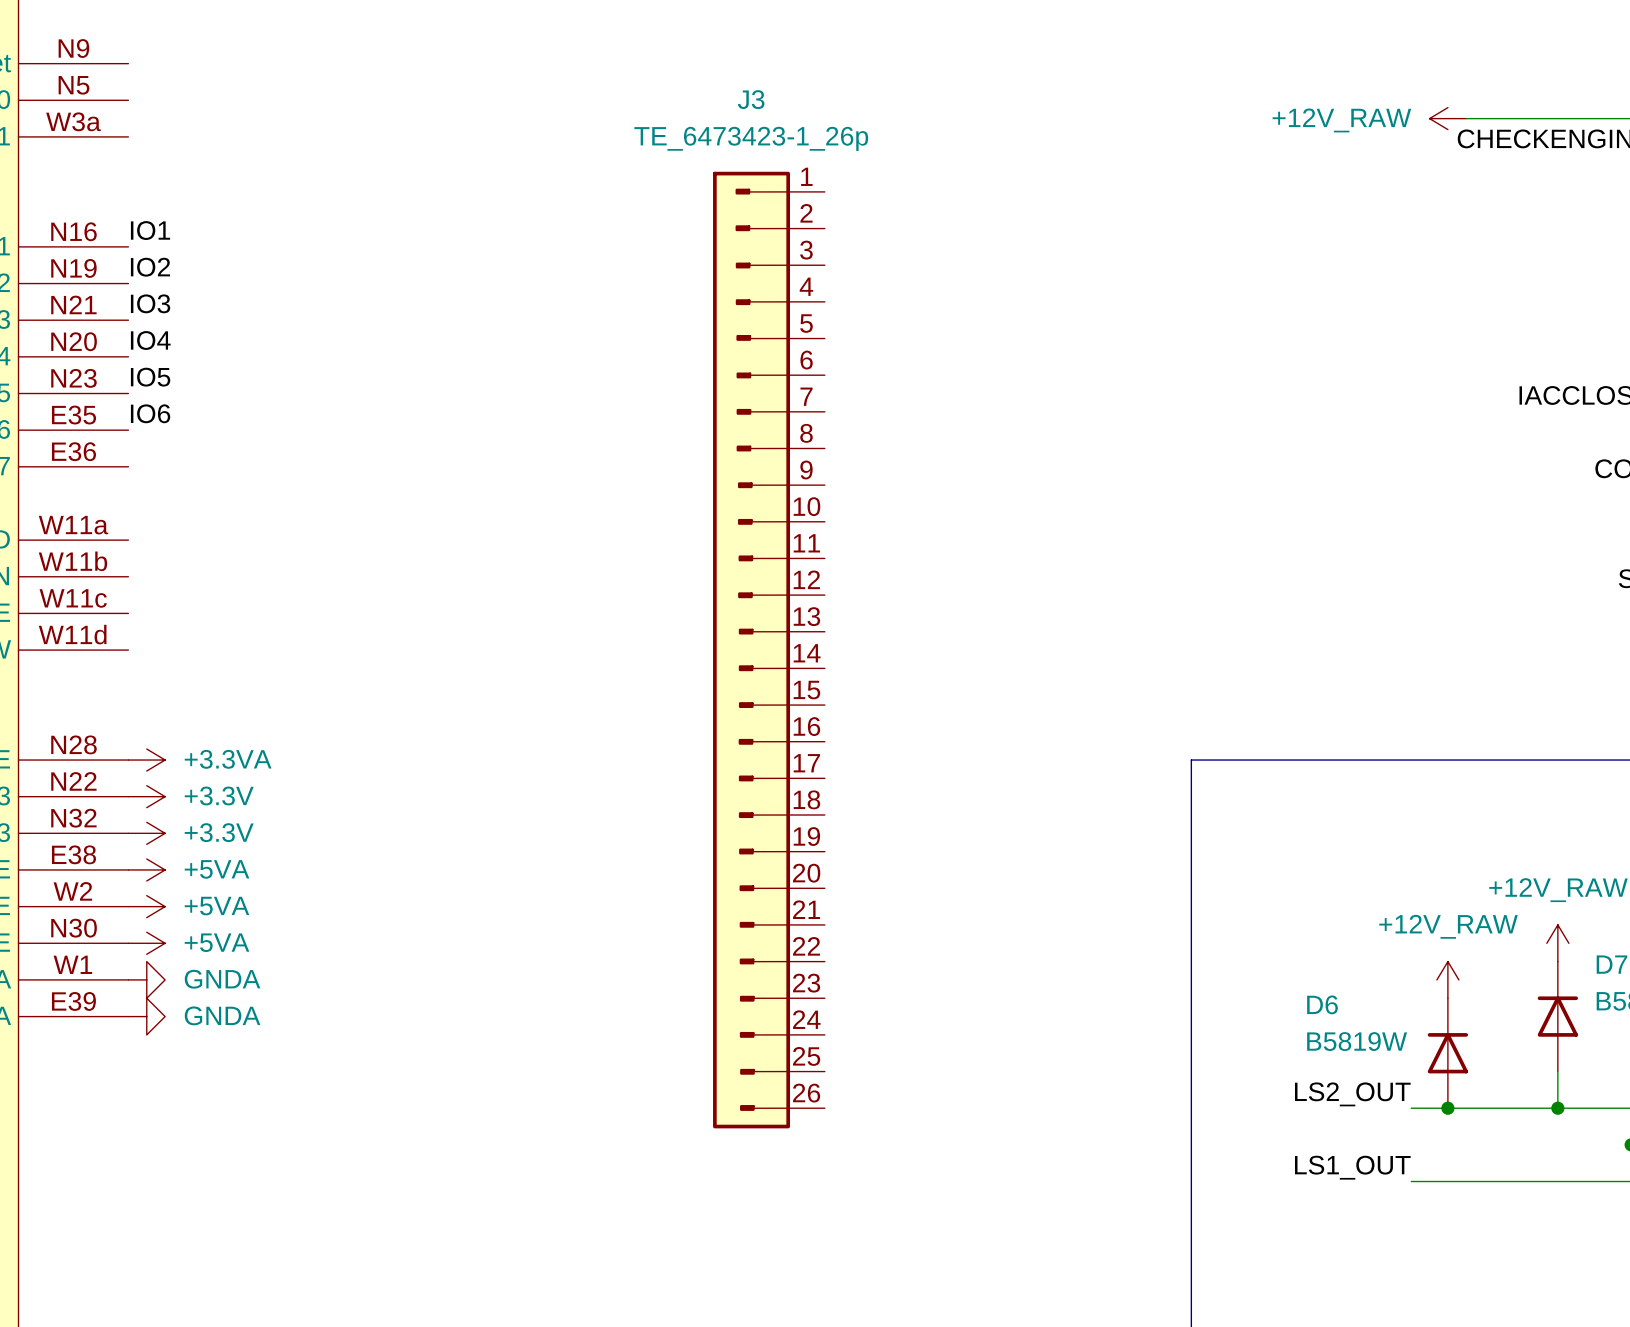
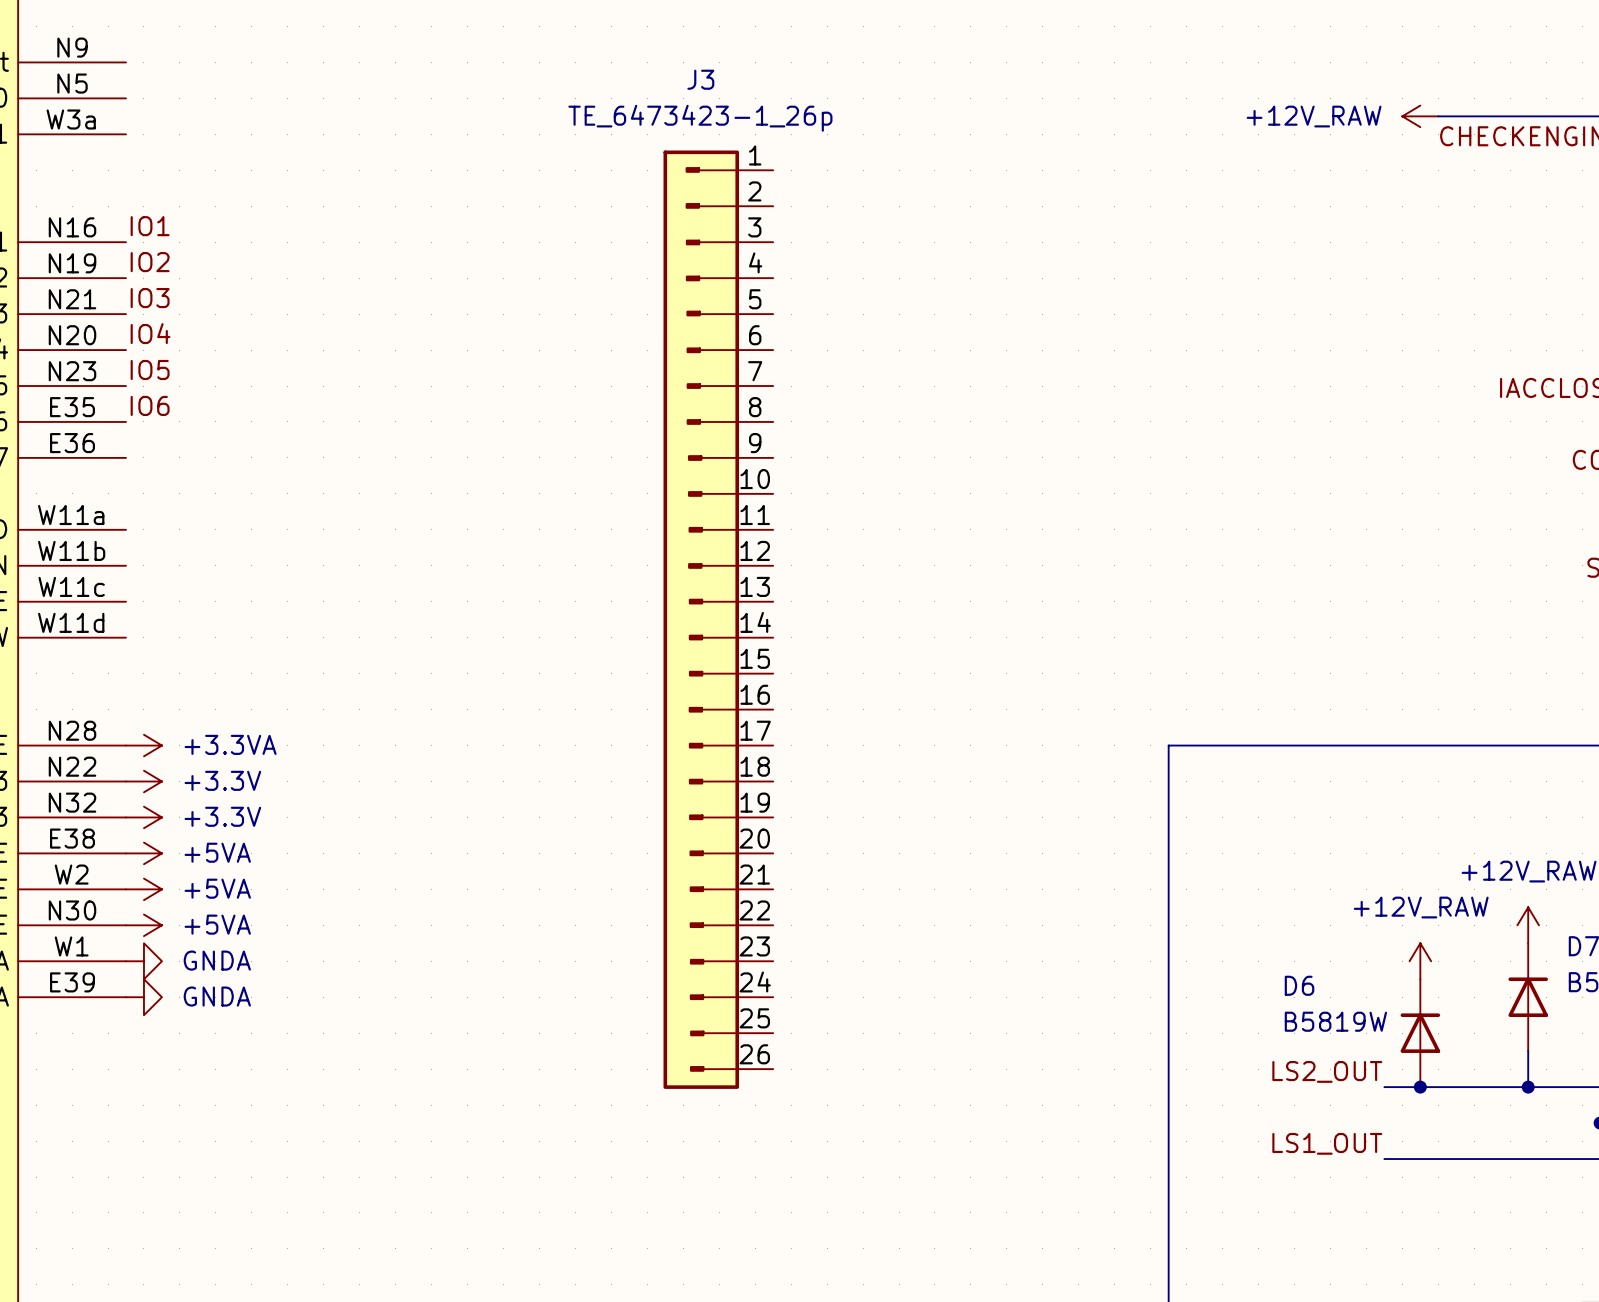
J3 position: (768, 650) -> (718, 619)

